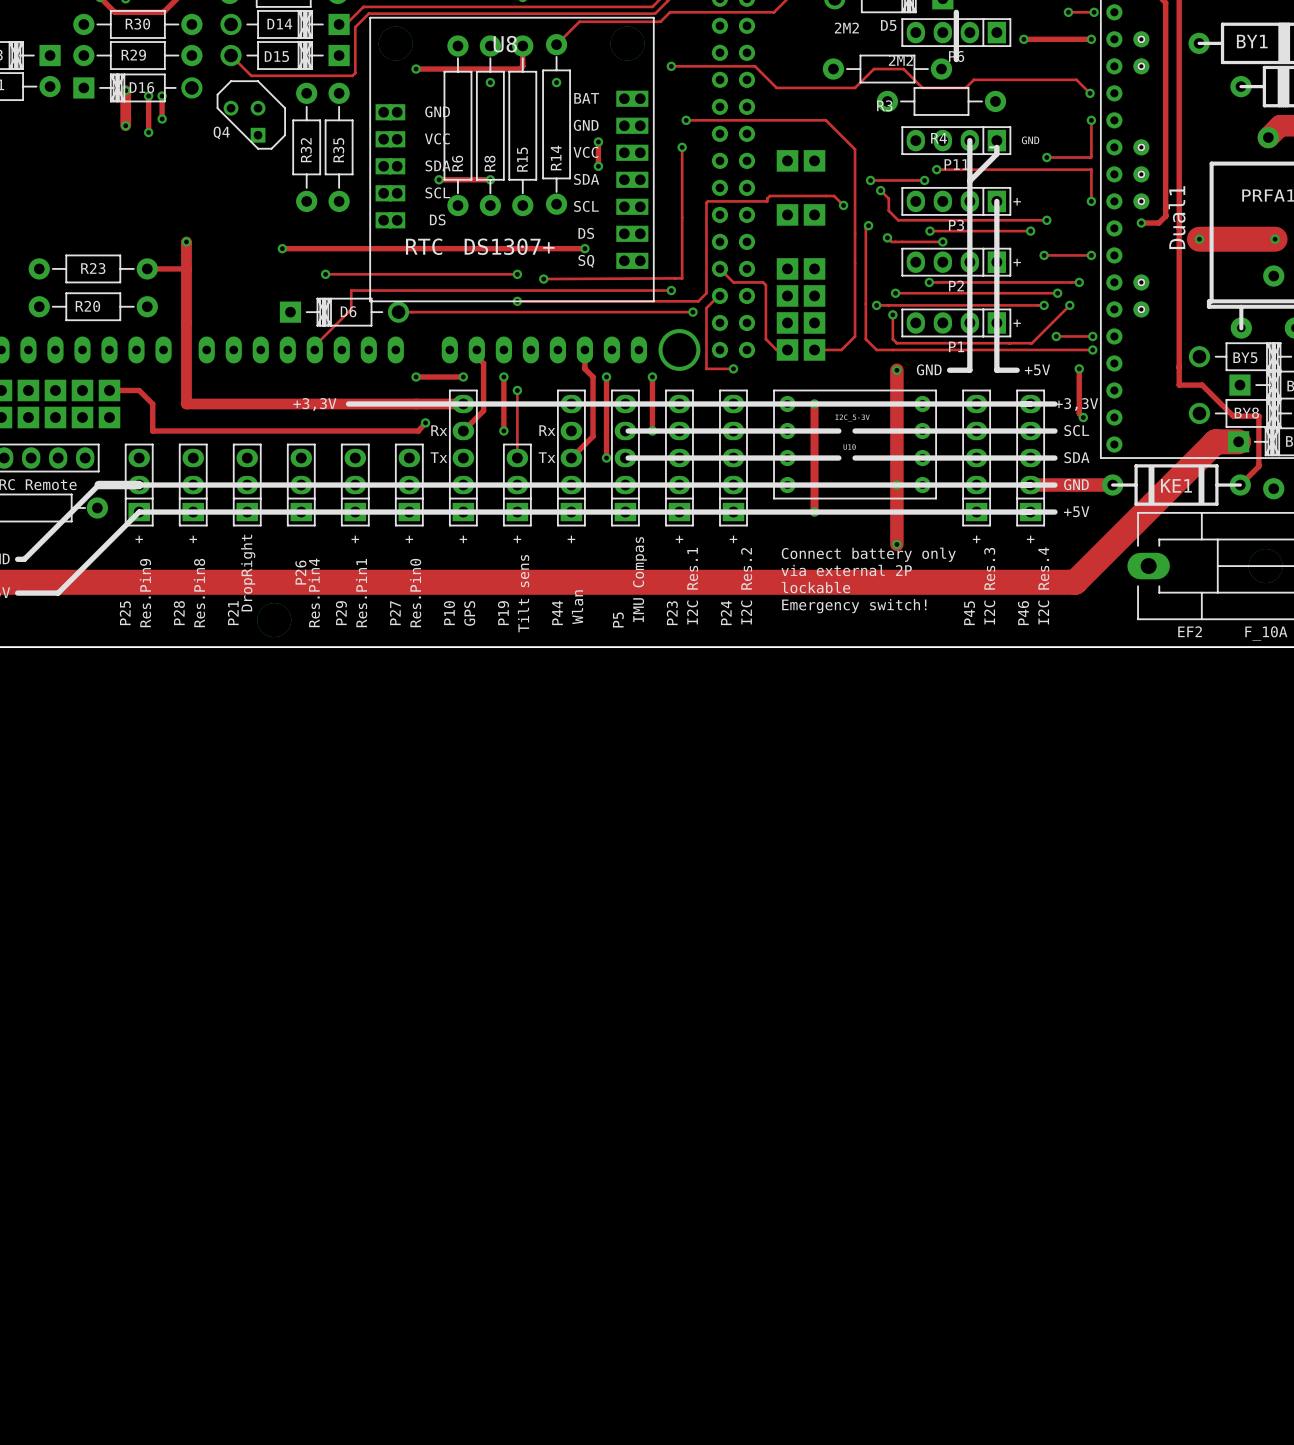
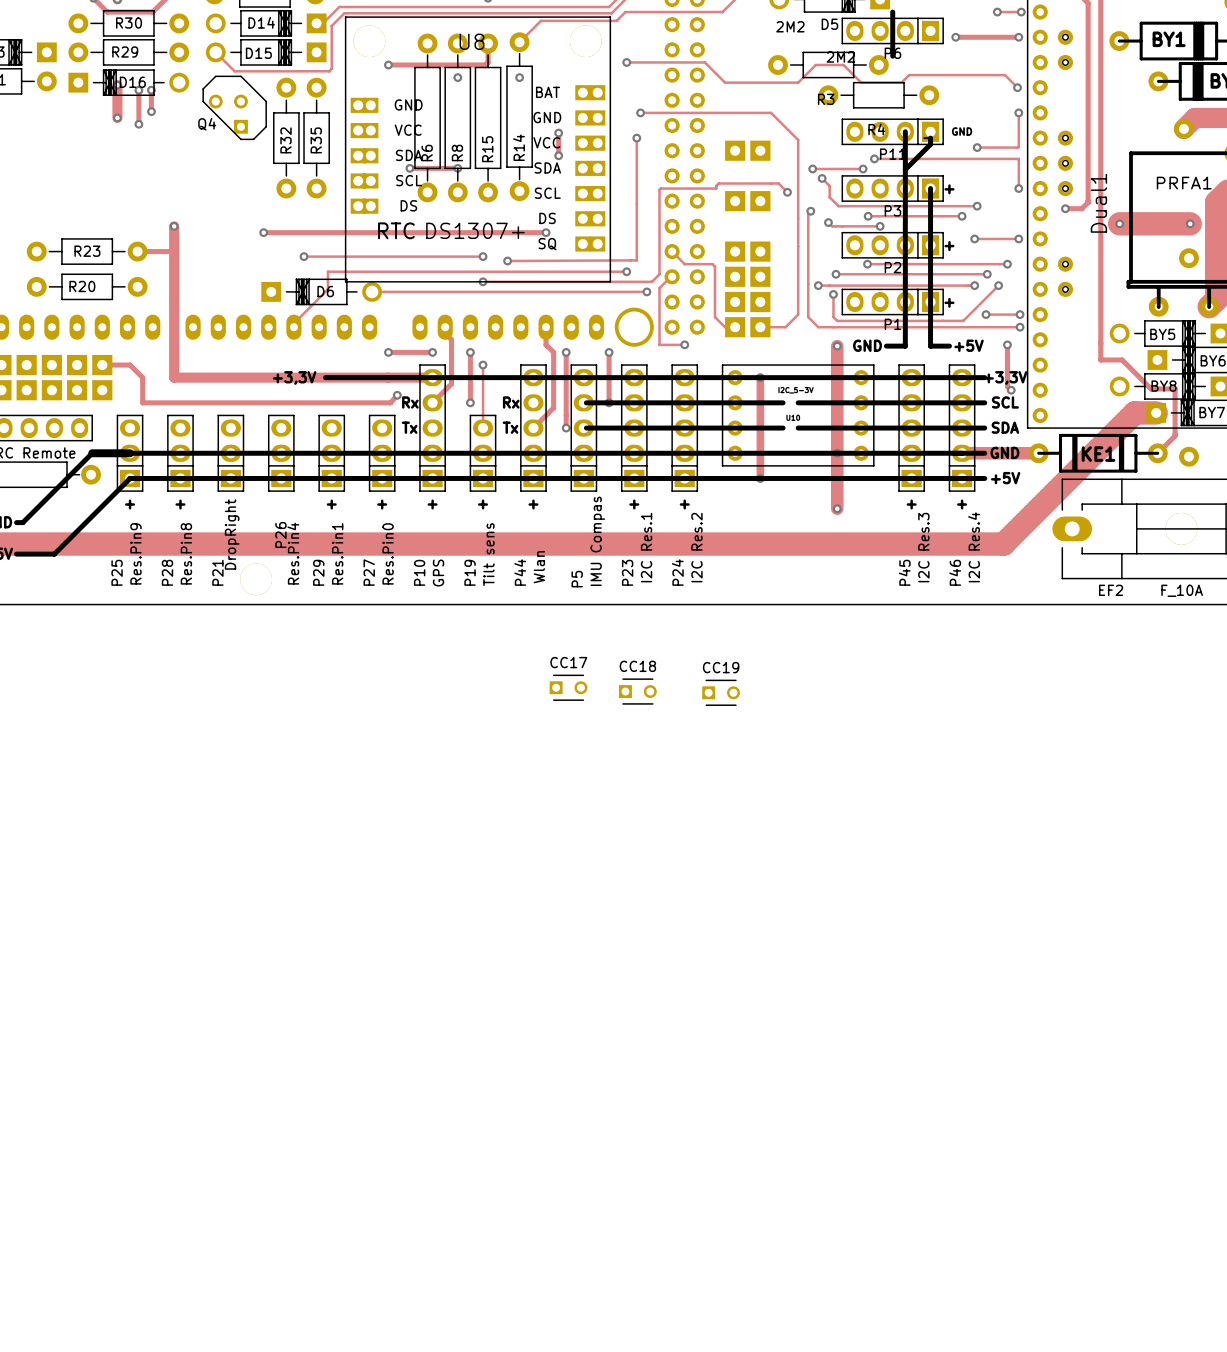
text: Connect battery only (868, 554) -> none
text: via external 2P (846, 570) -> none
text: lockable (816, 587) -> none
text: Emergency switch! (854, 606) -> none
CC17: none -> (568, 687)
CC18: none -> (637, 691)
CC19: none -> (721, 692)

